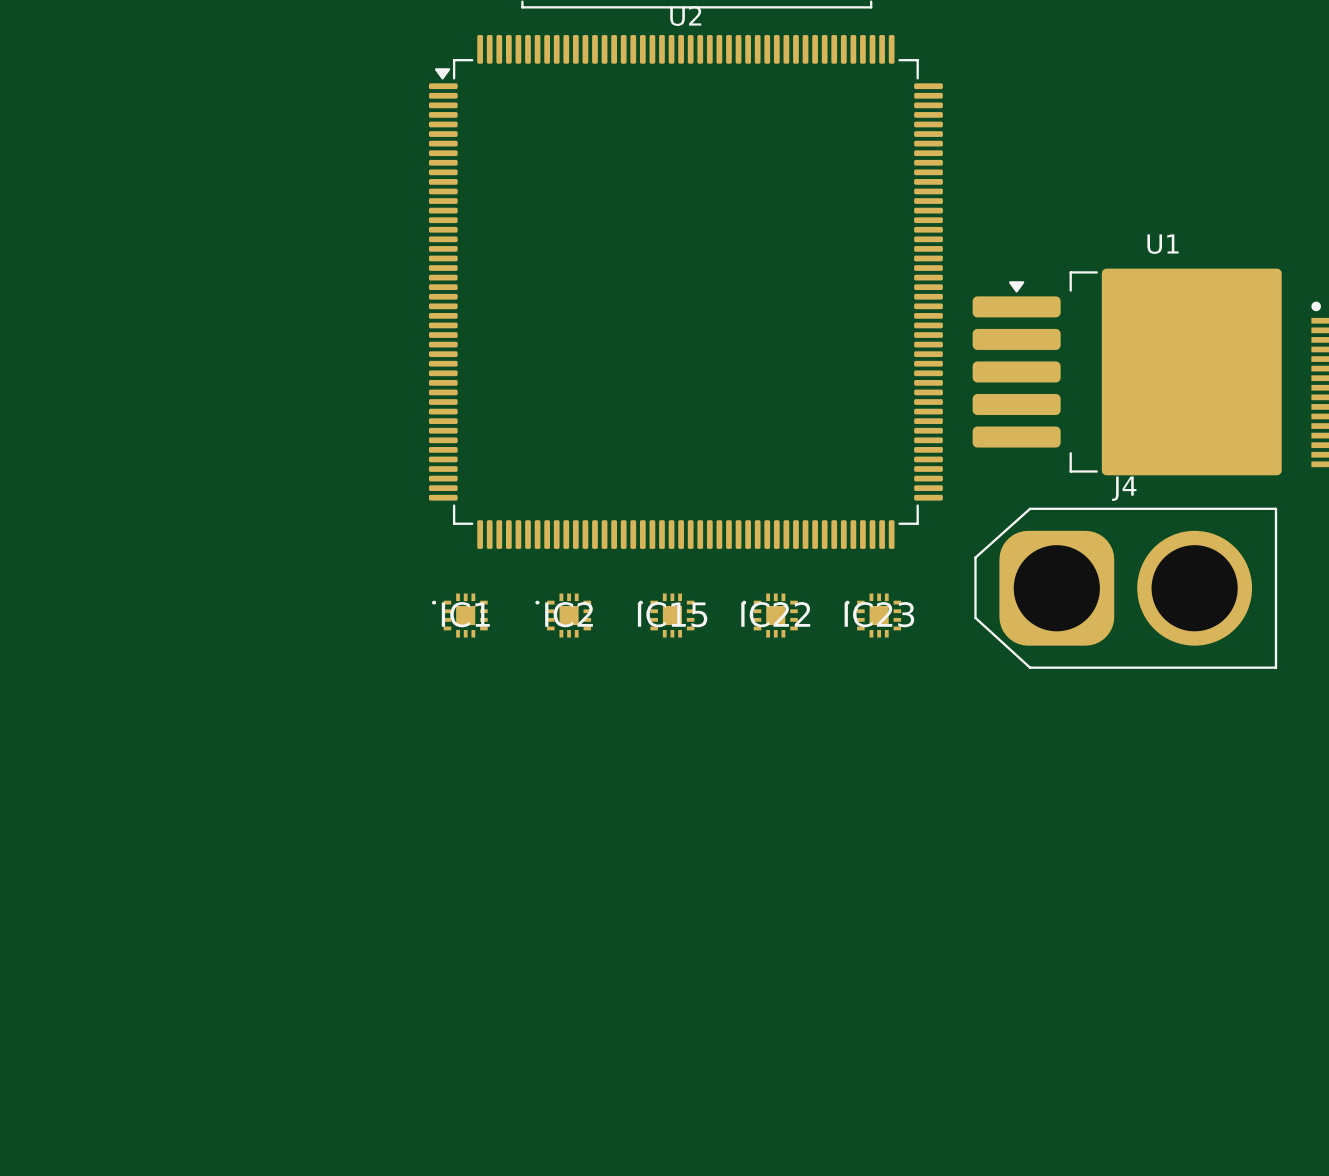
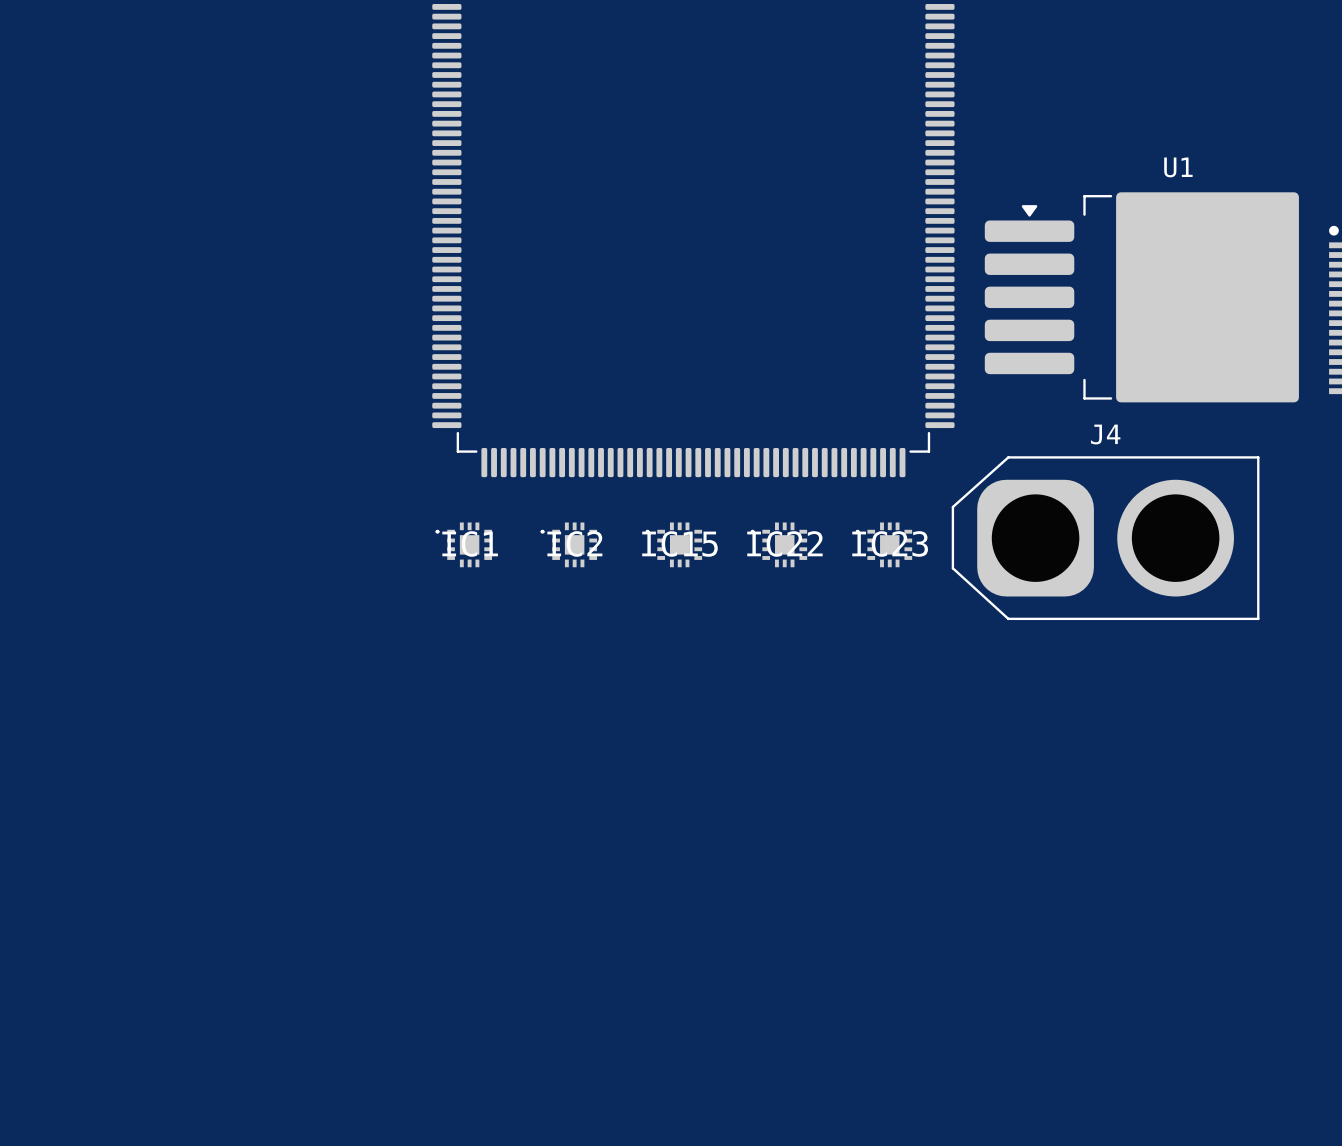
J4 position: (1125, 588) -> (1105, 538)

